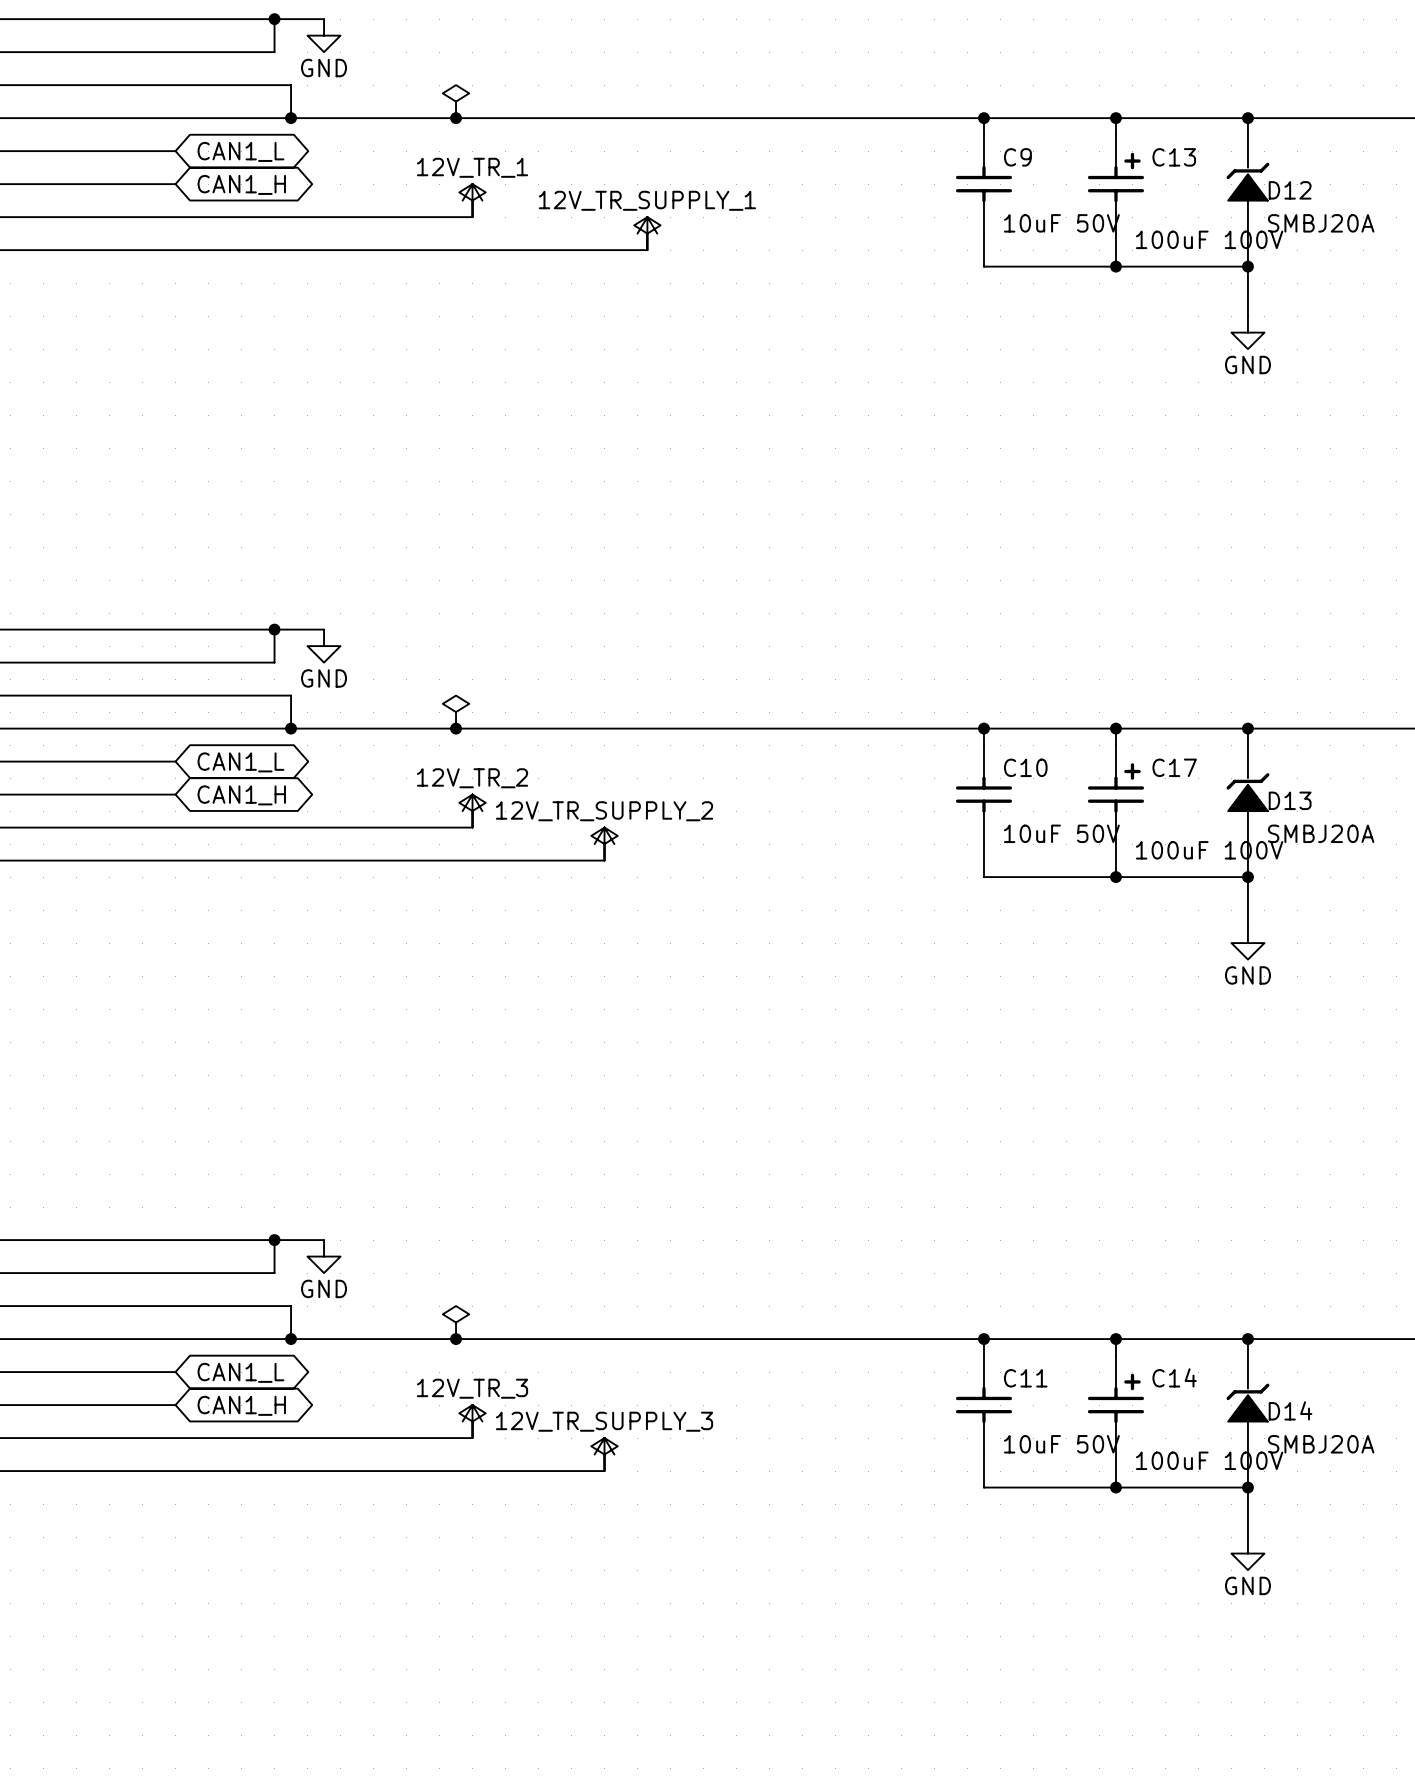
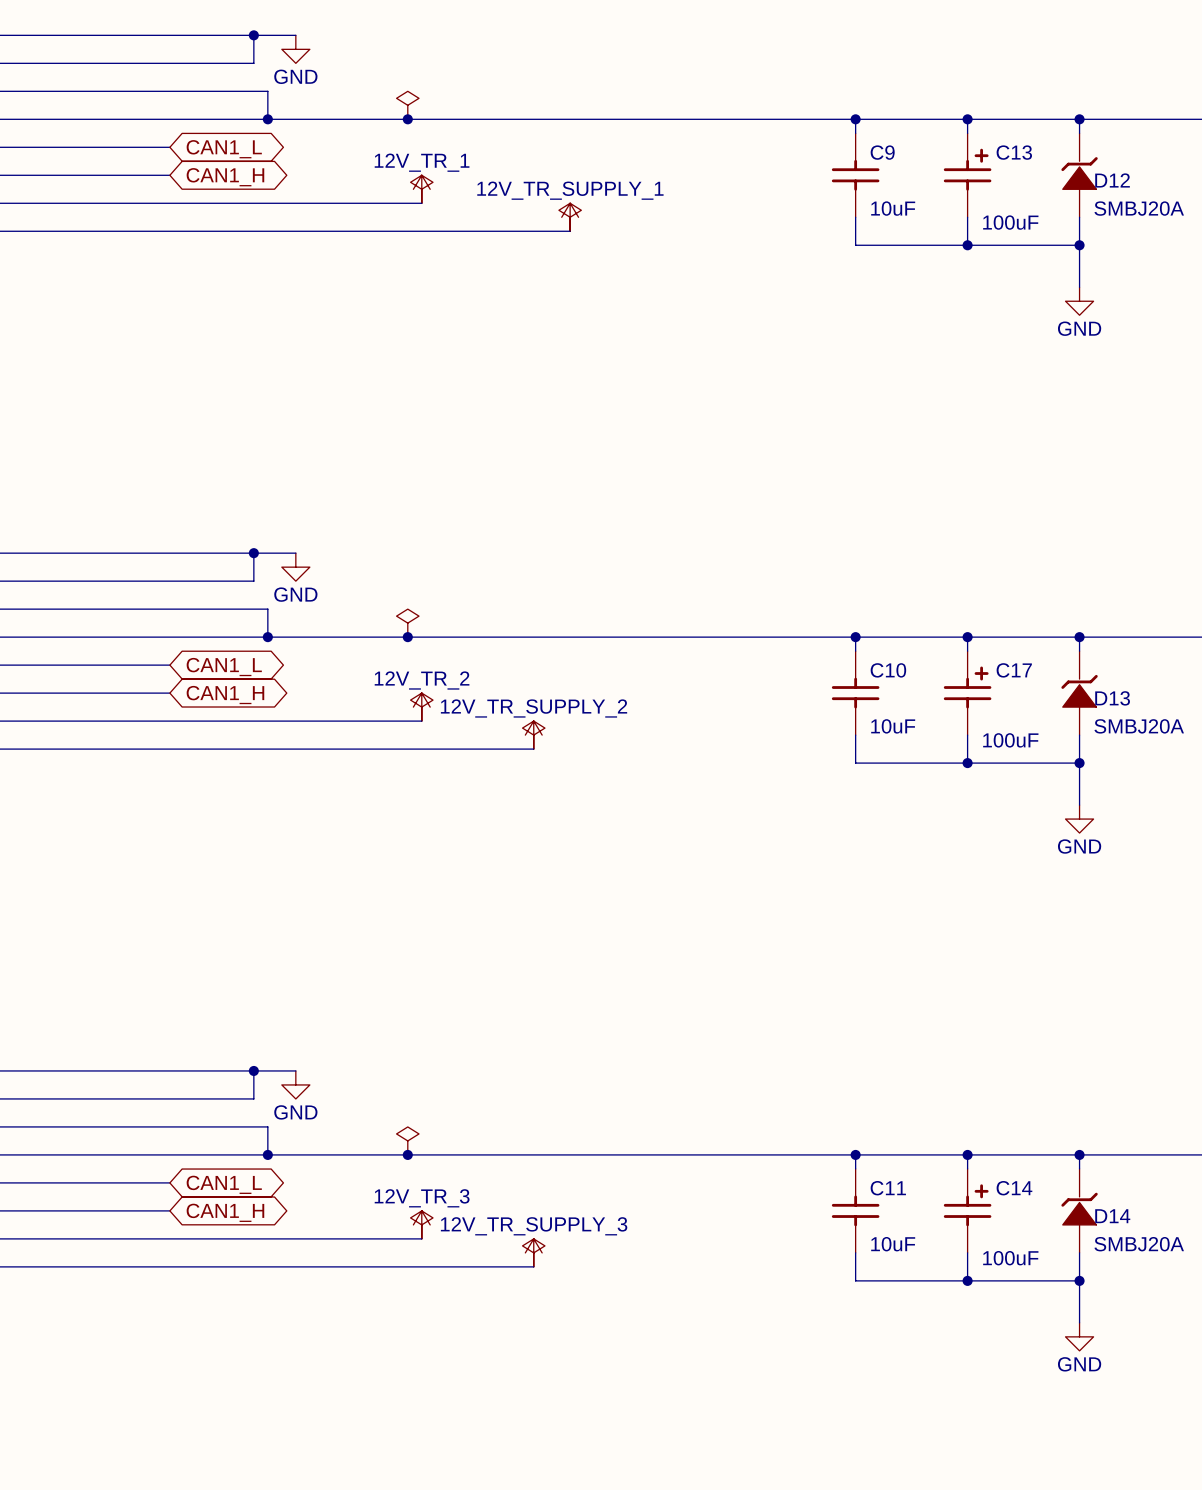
C9 value: 10uF 50V (1061, 223) -> 10uF (893, 208)
C13 value: 100uF 100V (1209, 239) -> 100uF (1010, 222)
C10 value: 10uF 50V (1061, 833) -> 10uF (893, 726)
C17 value: 100uF 100V (1209, 850) -> 100uF (1010, 740)
C11 value: 10uF 50V (1061, 1444) -> 10uF (893, 1244)
C14 value: 100uF 100V (1209, 1460) -> 100uF (1010, 1258)

